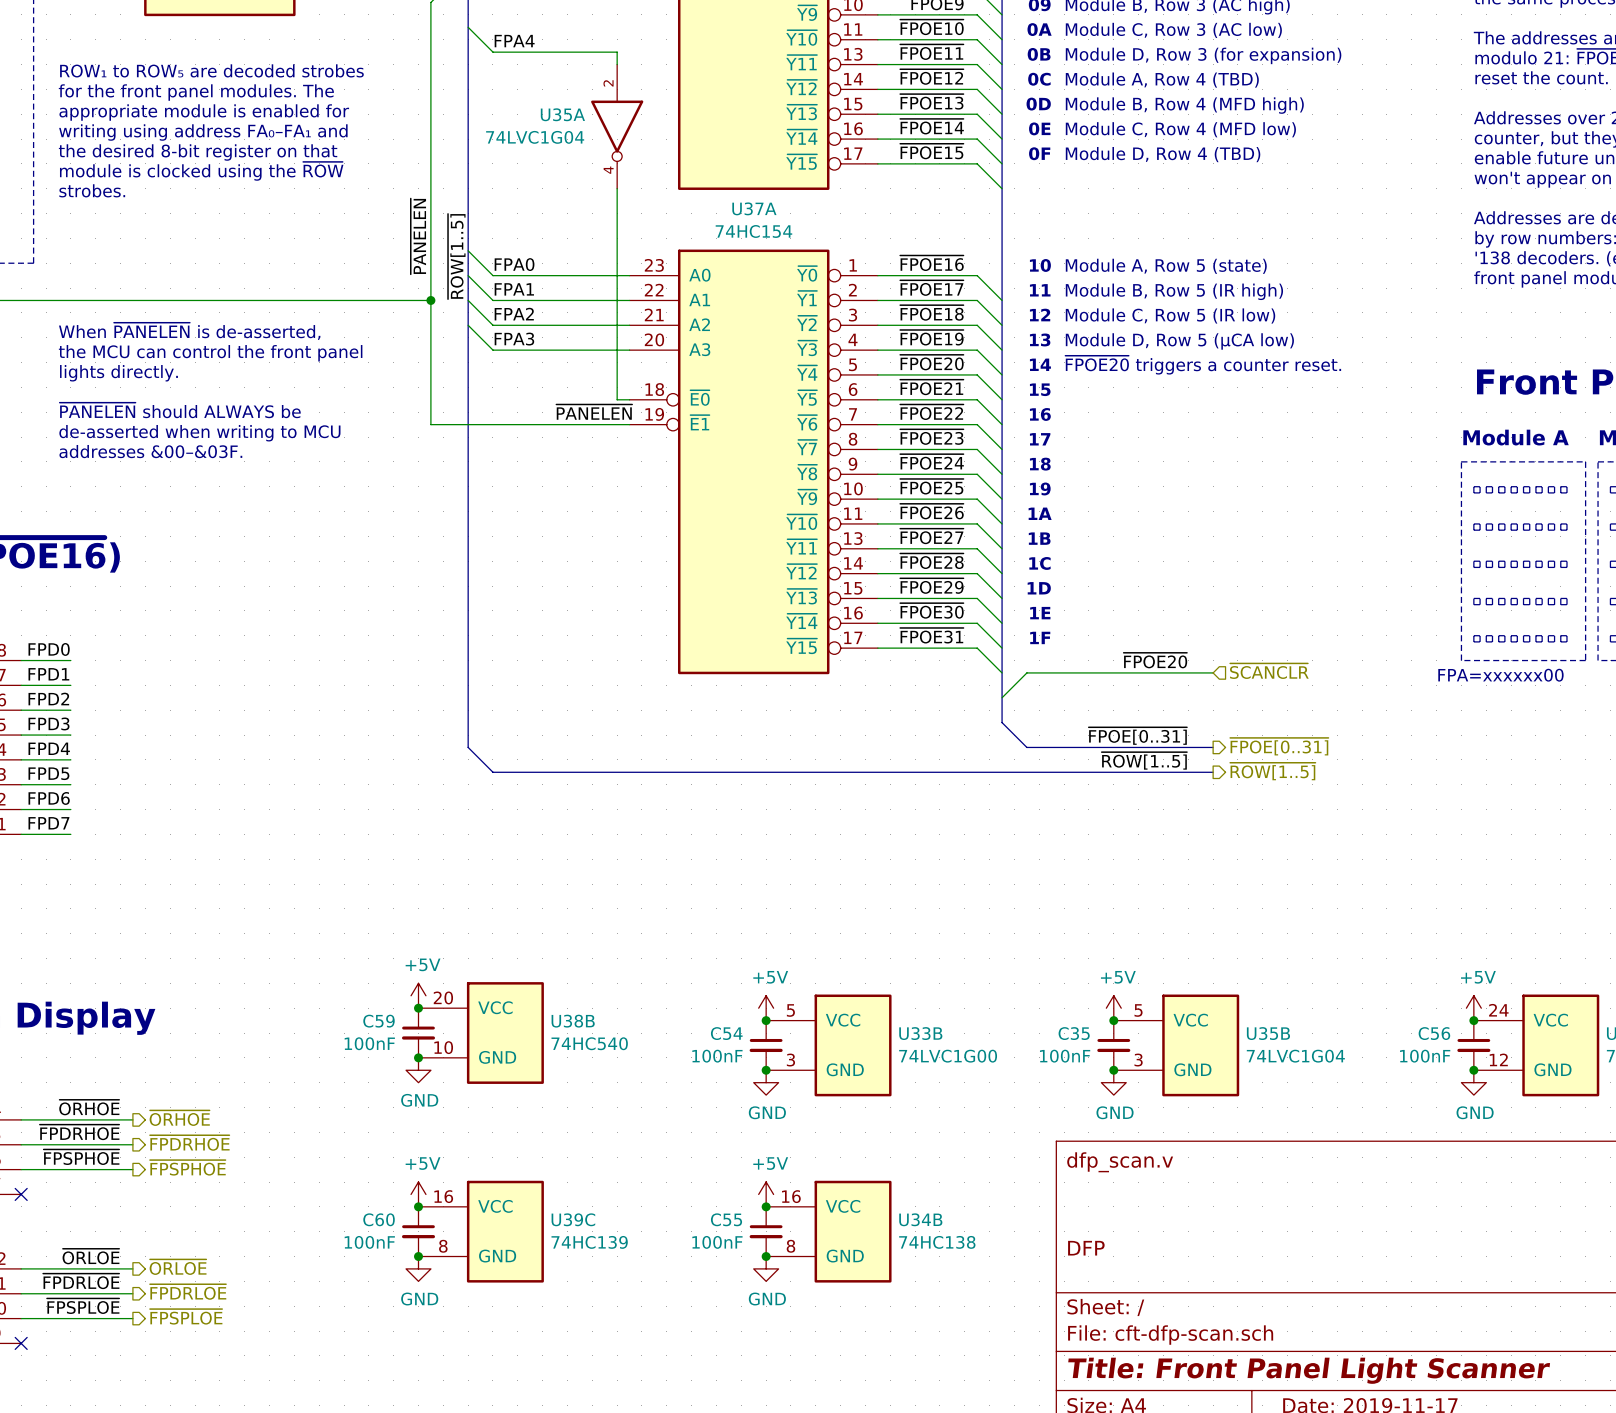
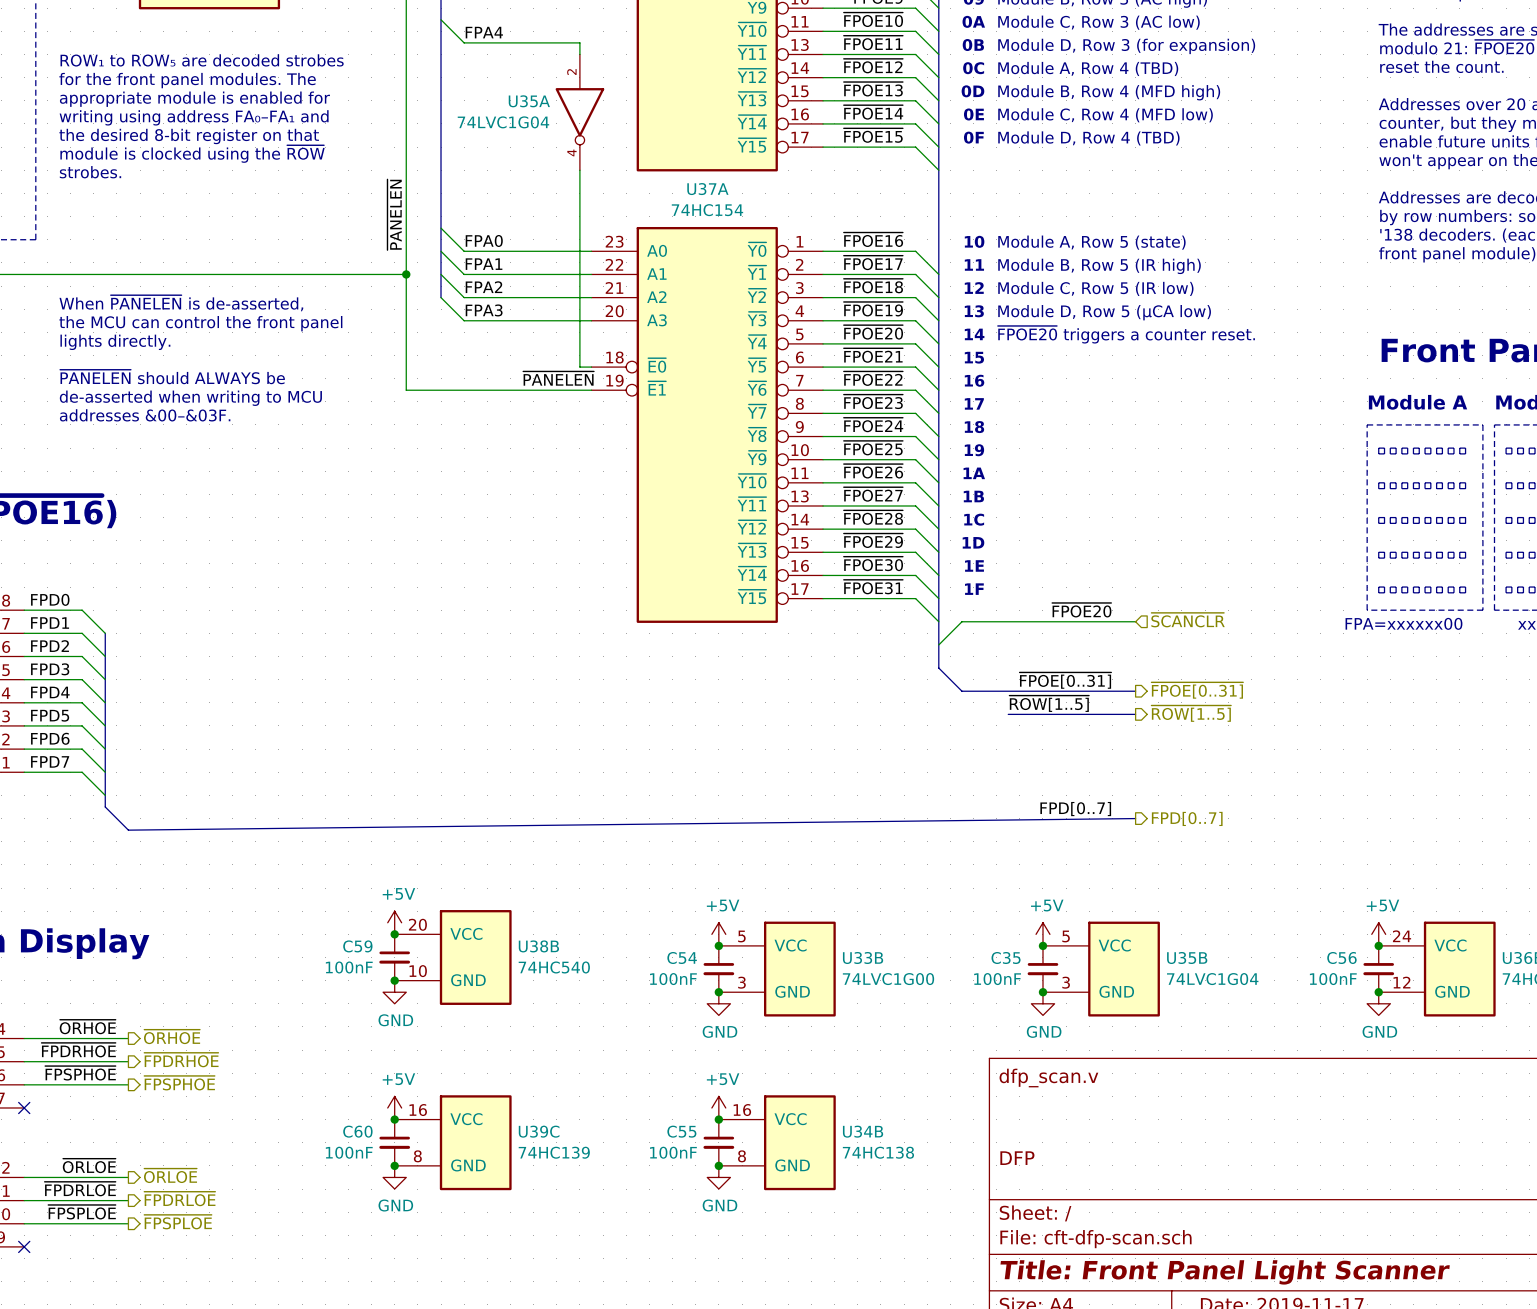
label: ~{ROW[1..5]} (456, 256) -> none
bus: (468, 325) (468, 747) (492, 772) (1076, 772) -> none
wire: none -> (70, 610) (82, 610) (105, 633)
wire: none -> (70, 633) (82, 633) (105, 656)
bus: none -> (105, 633) (105, 806) (128, 830) (1135, 818)
wire: none -> (70, 656) (82, 656) (105, 679)
wire: none -> (70, 679) (82, 679) (105, 702)
wire: none -> (70, 702) (82, 702) (105, 725)
label position: ~{ROW[1..5]} (1144, 760) -> ~{ROW[1..5]} (1049, 703)
wire: none -> (70, 725) (82, 725) (105, 749)
wire: none -> (70, 749) (82, 749) (105, 772)
wire: none -> (70, 772) (82, 772) (105, 795)
label: none -> FPD[0..7] (1075, 809)
hierarchical label: none -> FPD[0..7] (1187, 818)

